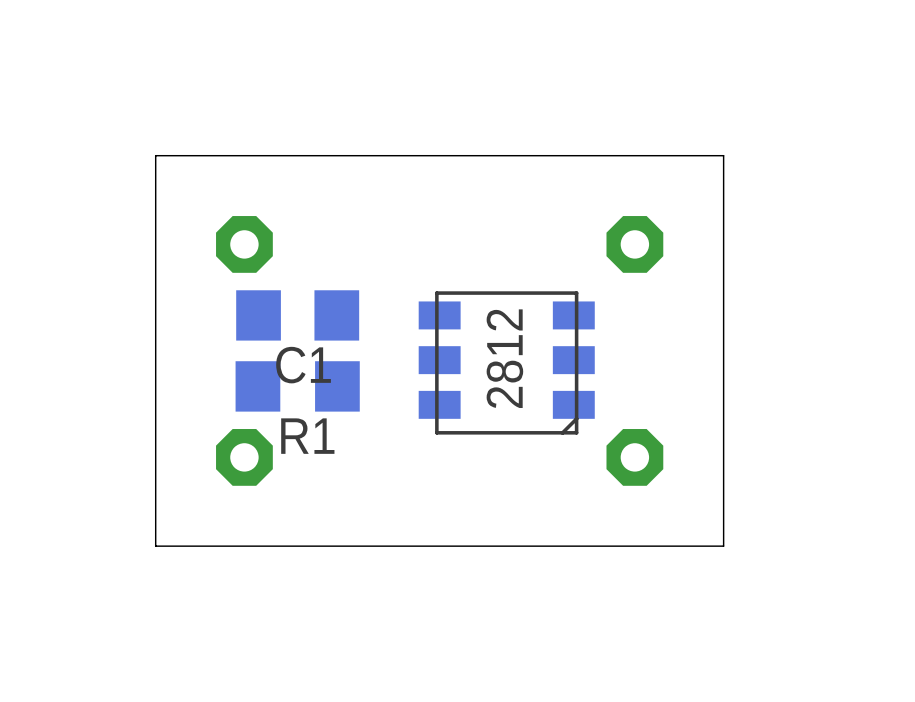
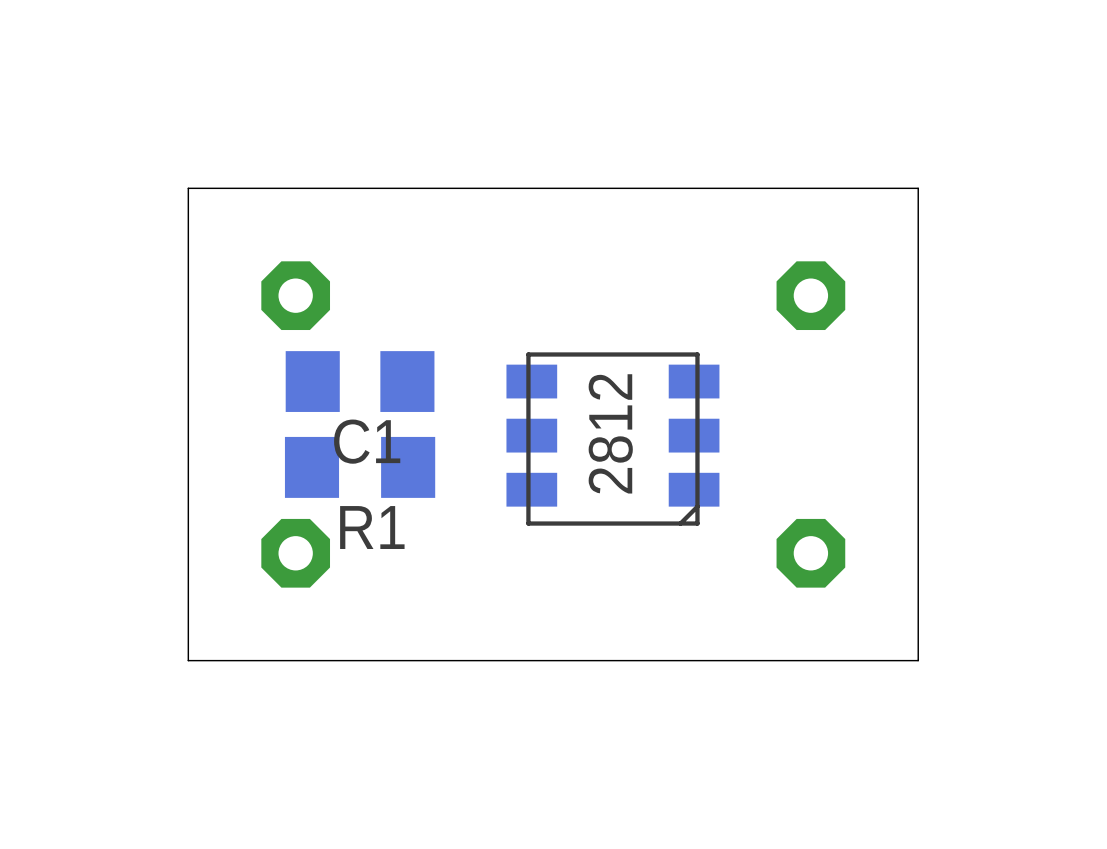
board edge: (723, 155) (723, 546) -> (875, 188) (918, 188) (918, 660) (875, 660)
part position: (634, 244) -> (810, 295)
part position: (634, 457) -> (810, 553)

